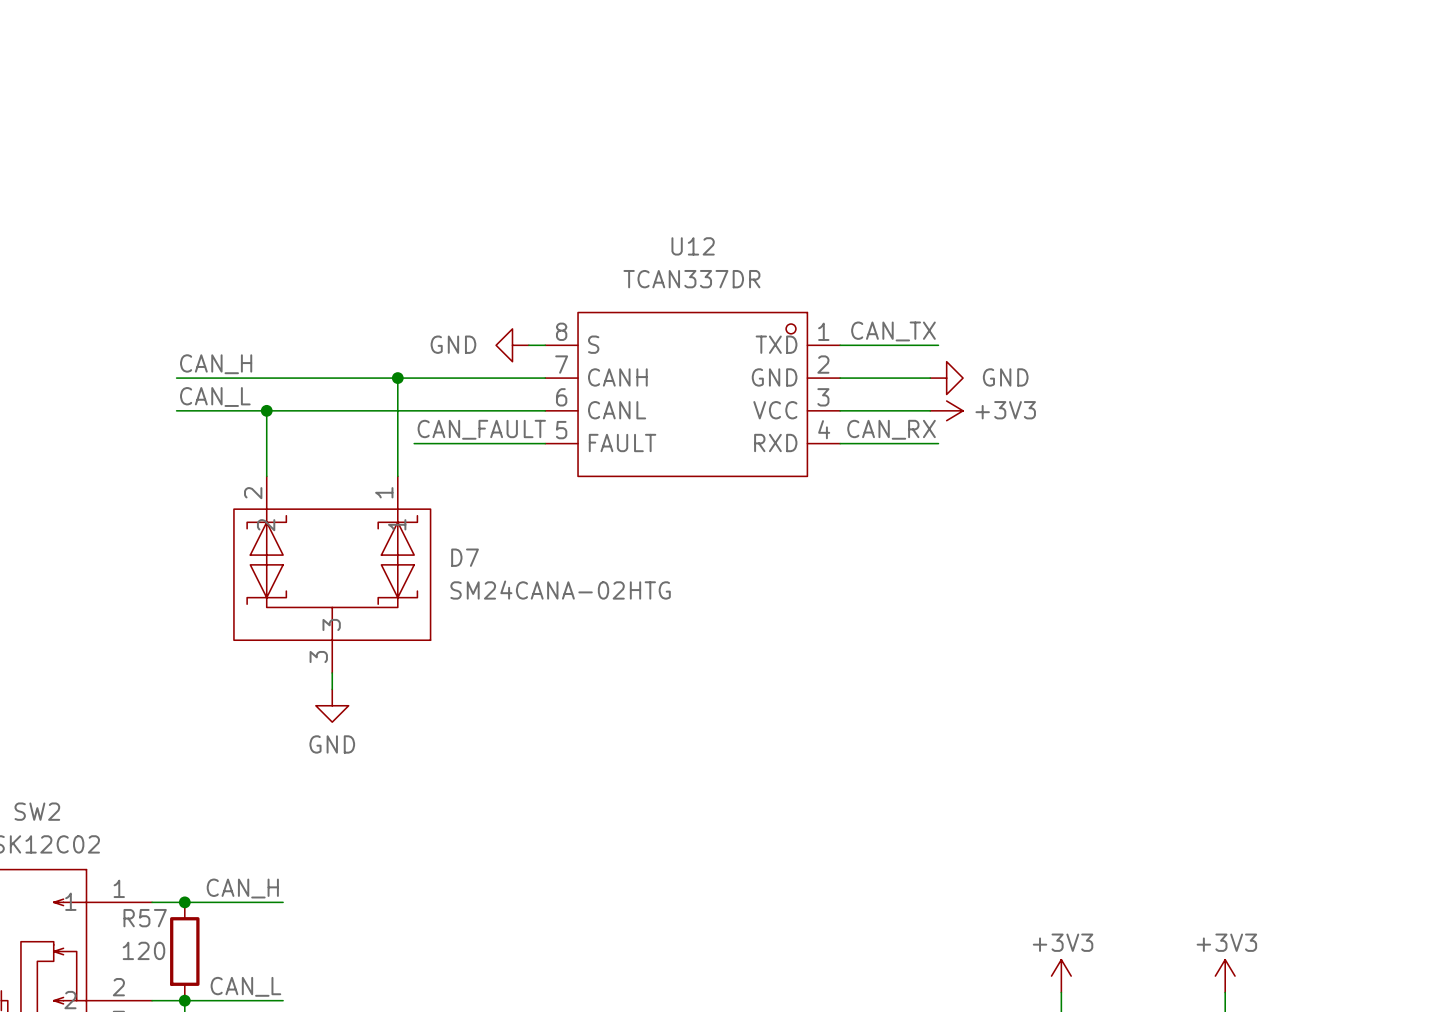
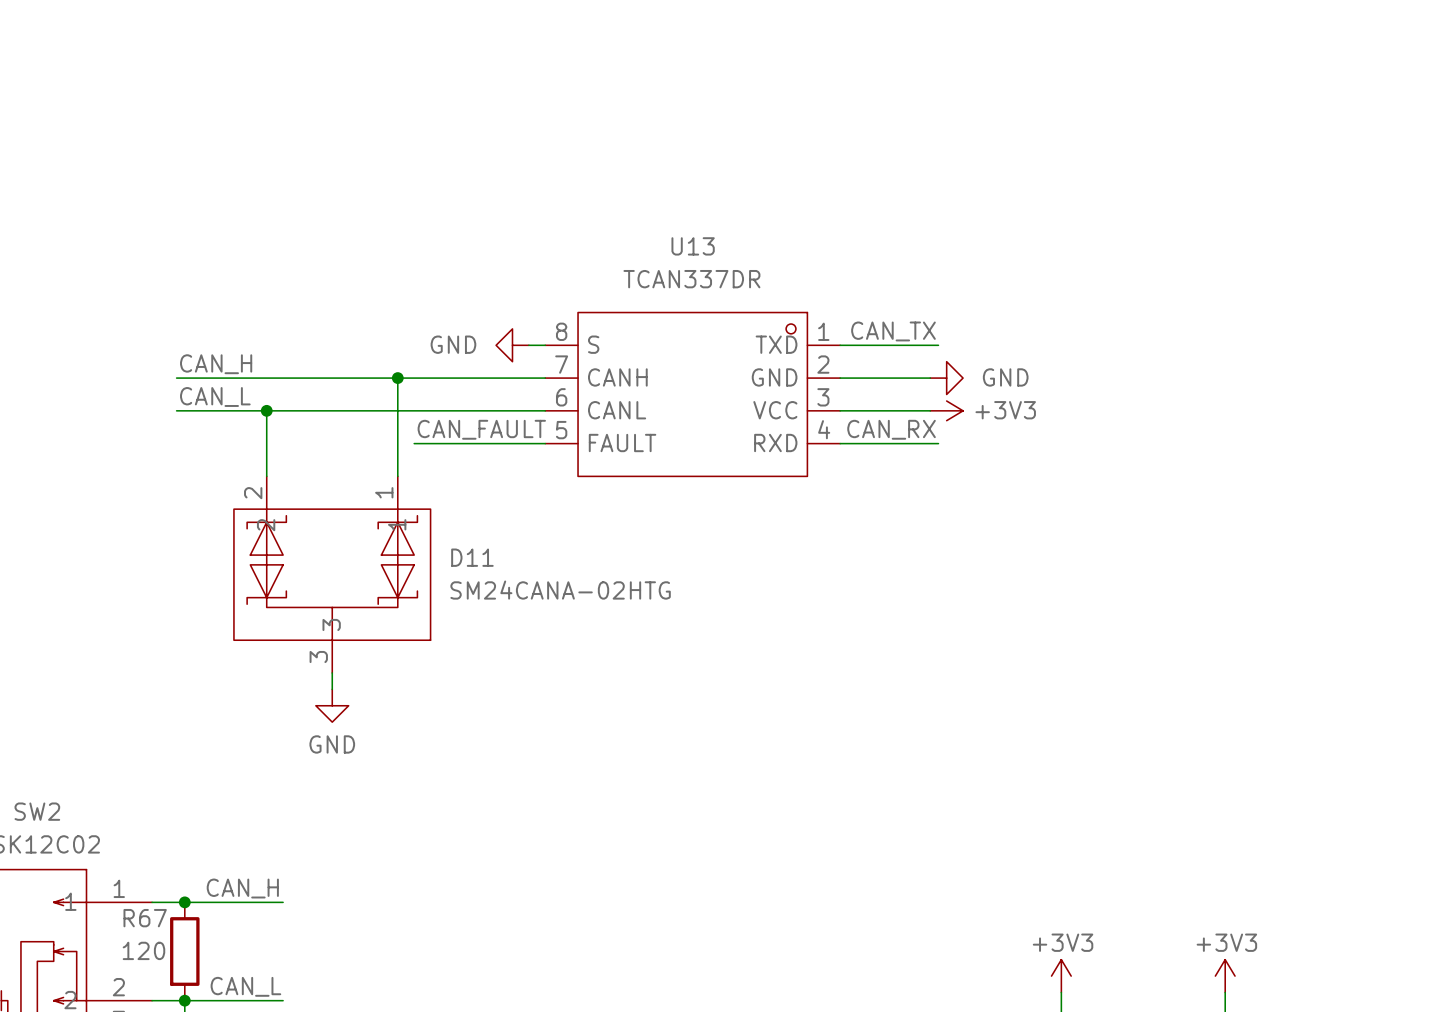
U12 name: U12 (693, 246) -> U13 (693, 246)
D7 name: D7 (465, 557) -> D11 (472, 557)
R57 name: R57 (145, 918) -> R67 (145, 918)

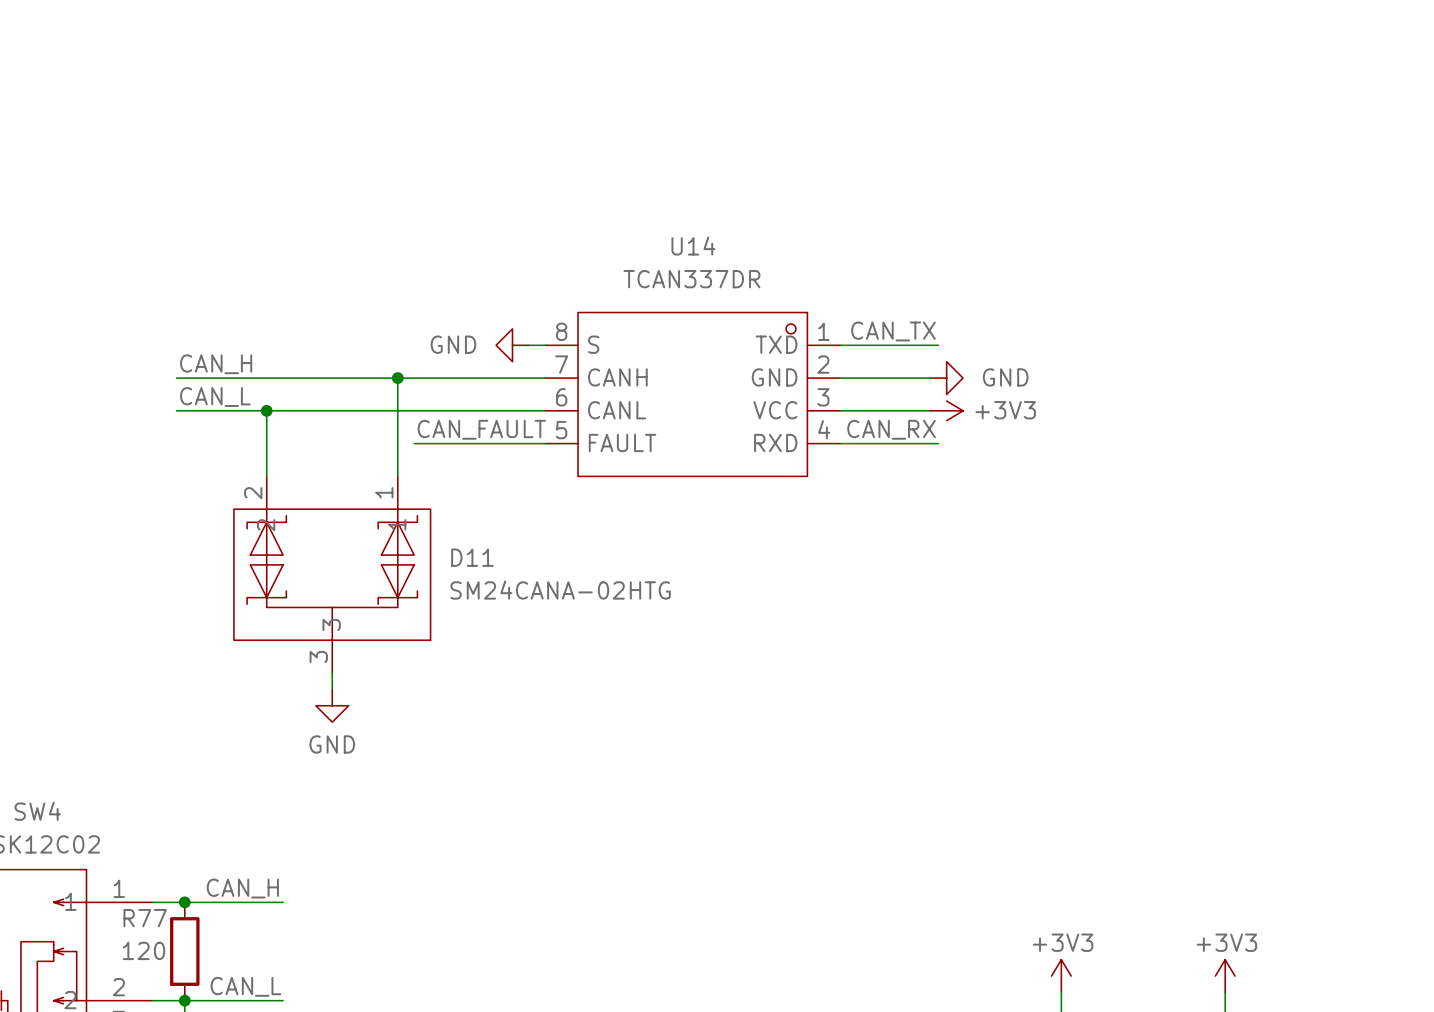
U13 name: U13 (693, 246) -> U14 (693, 246)
SW2 name: SW2 (37, 811) -> SW4 (37, 811)
R67 name: R67 (145, 918) -> R77 (145, 918)

